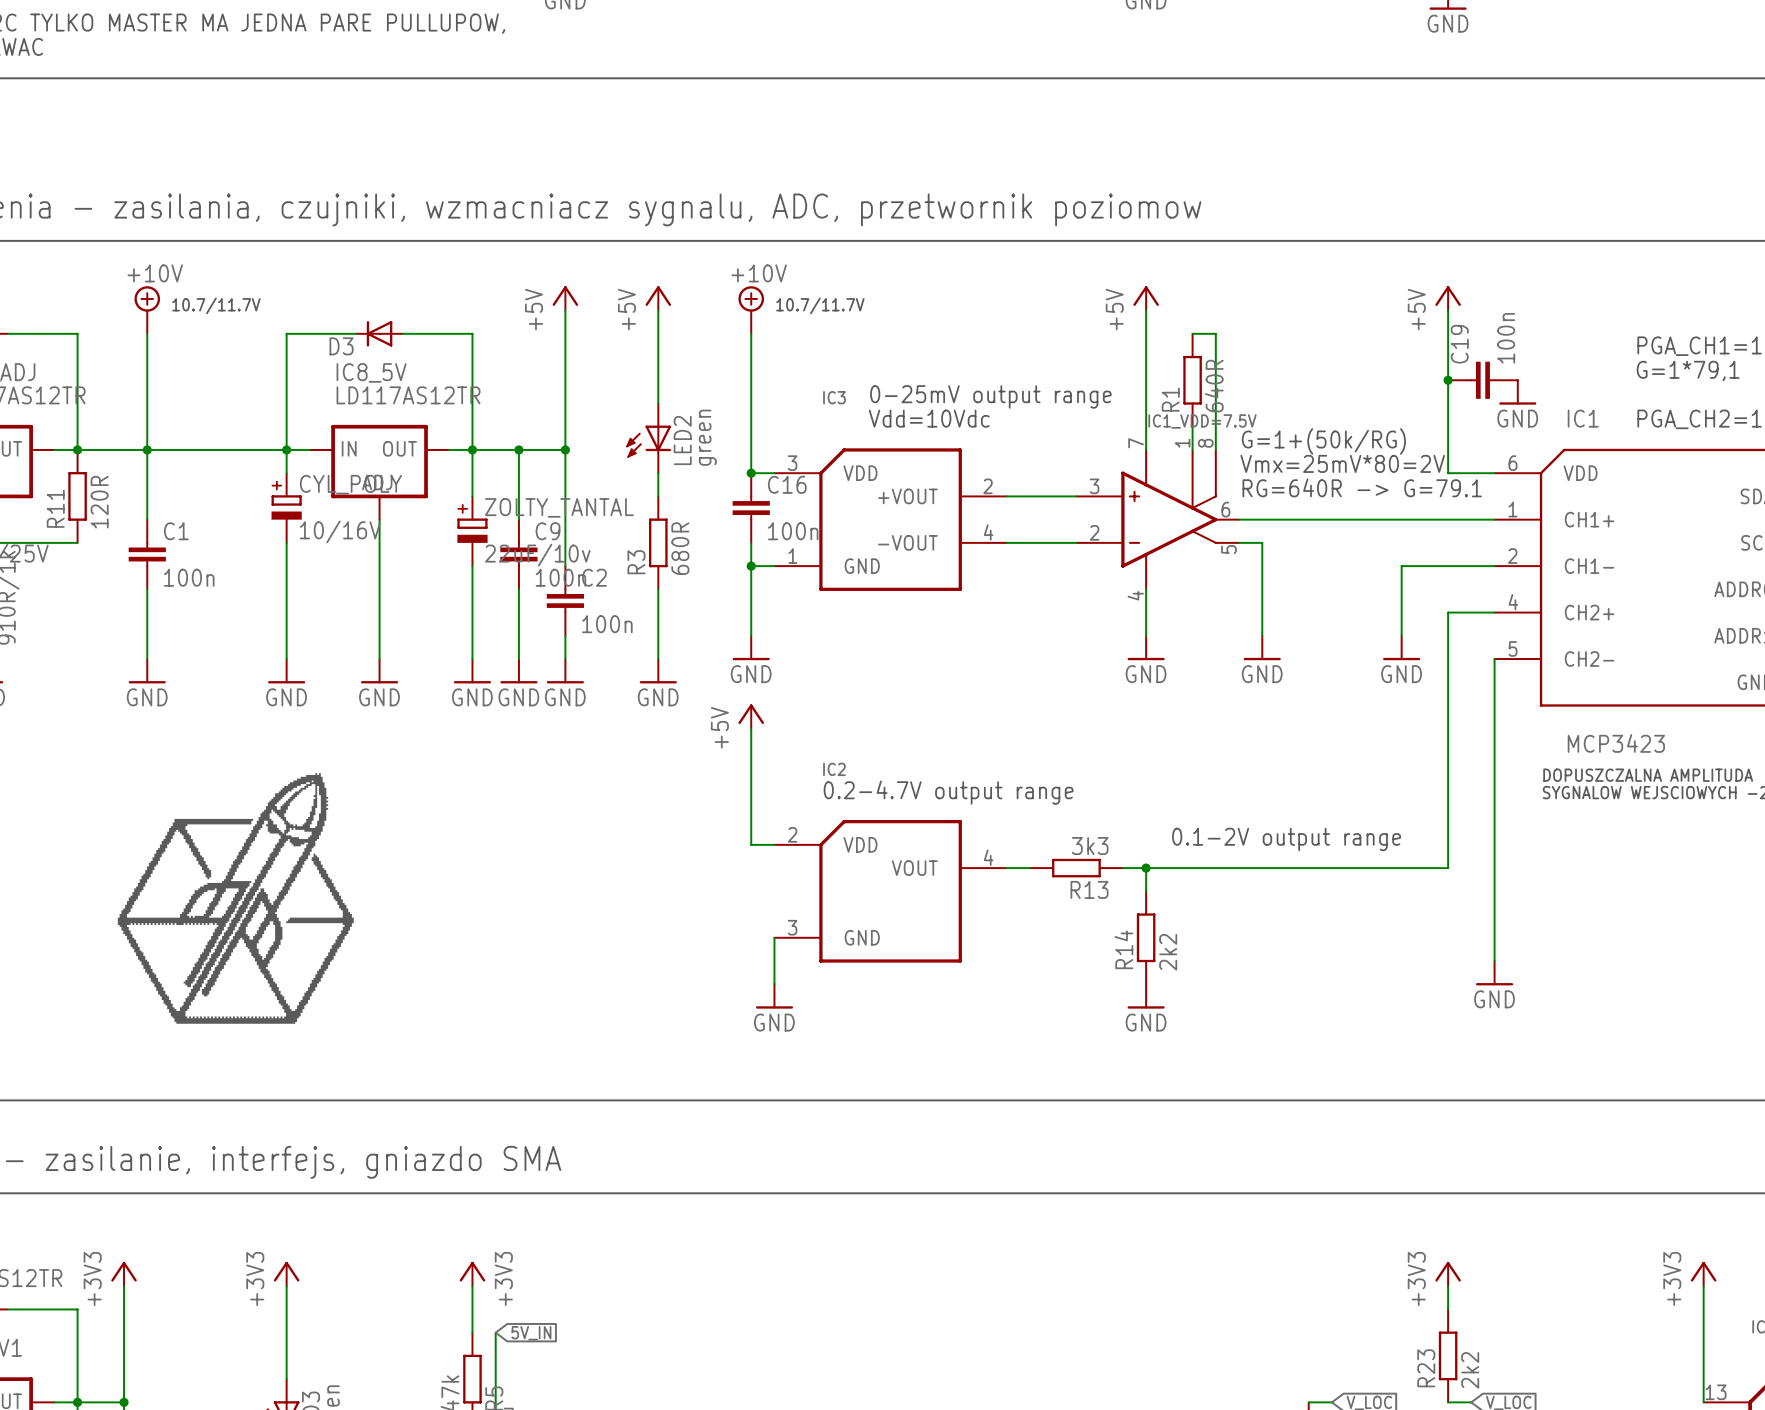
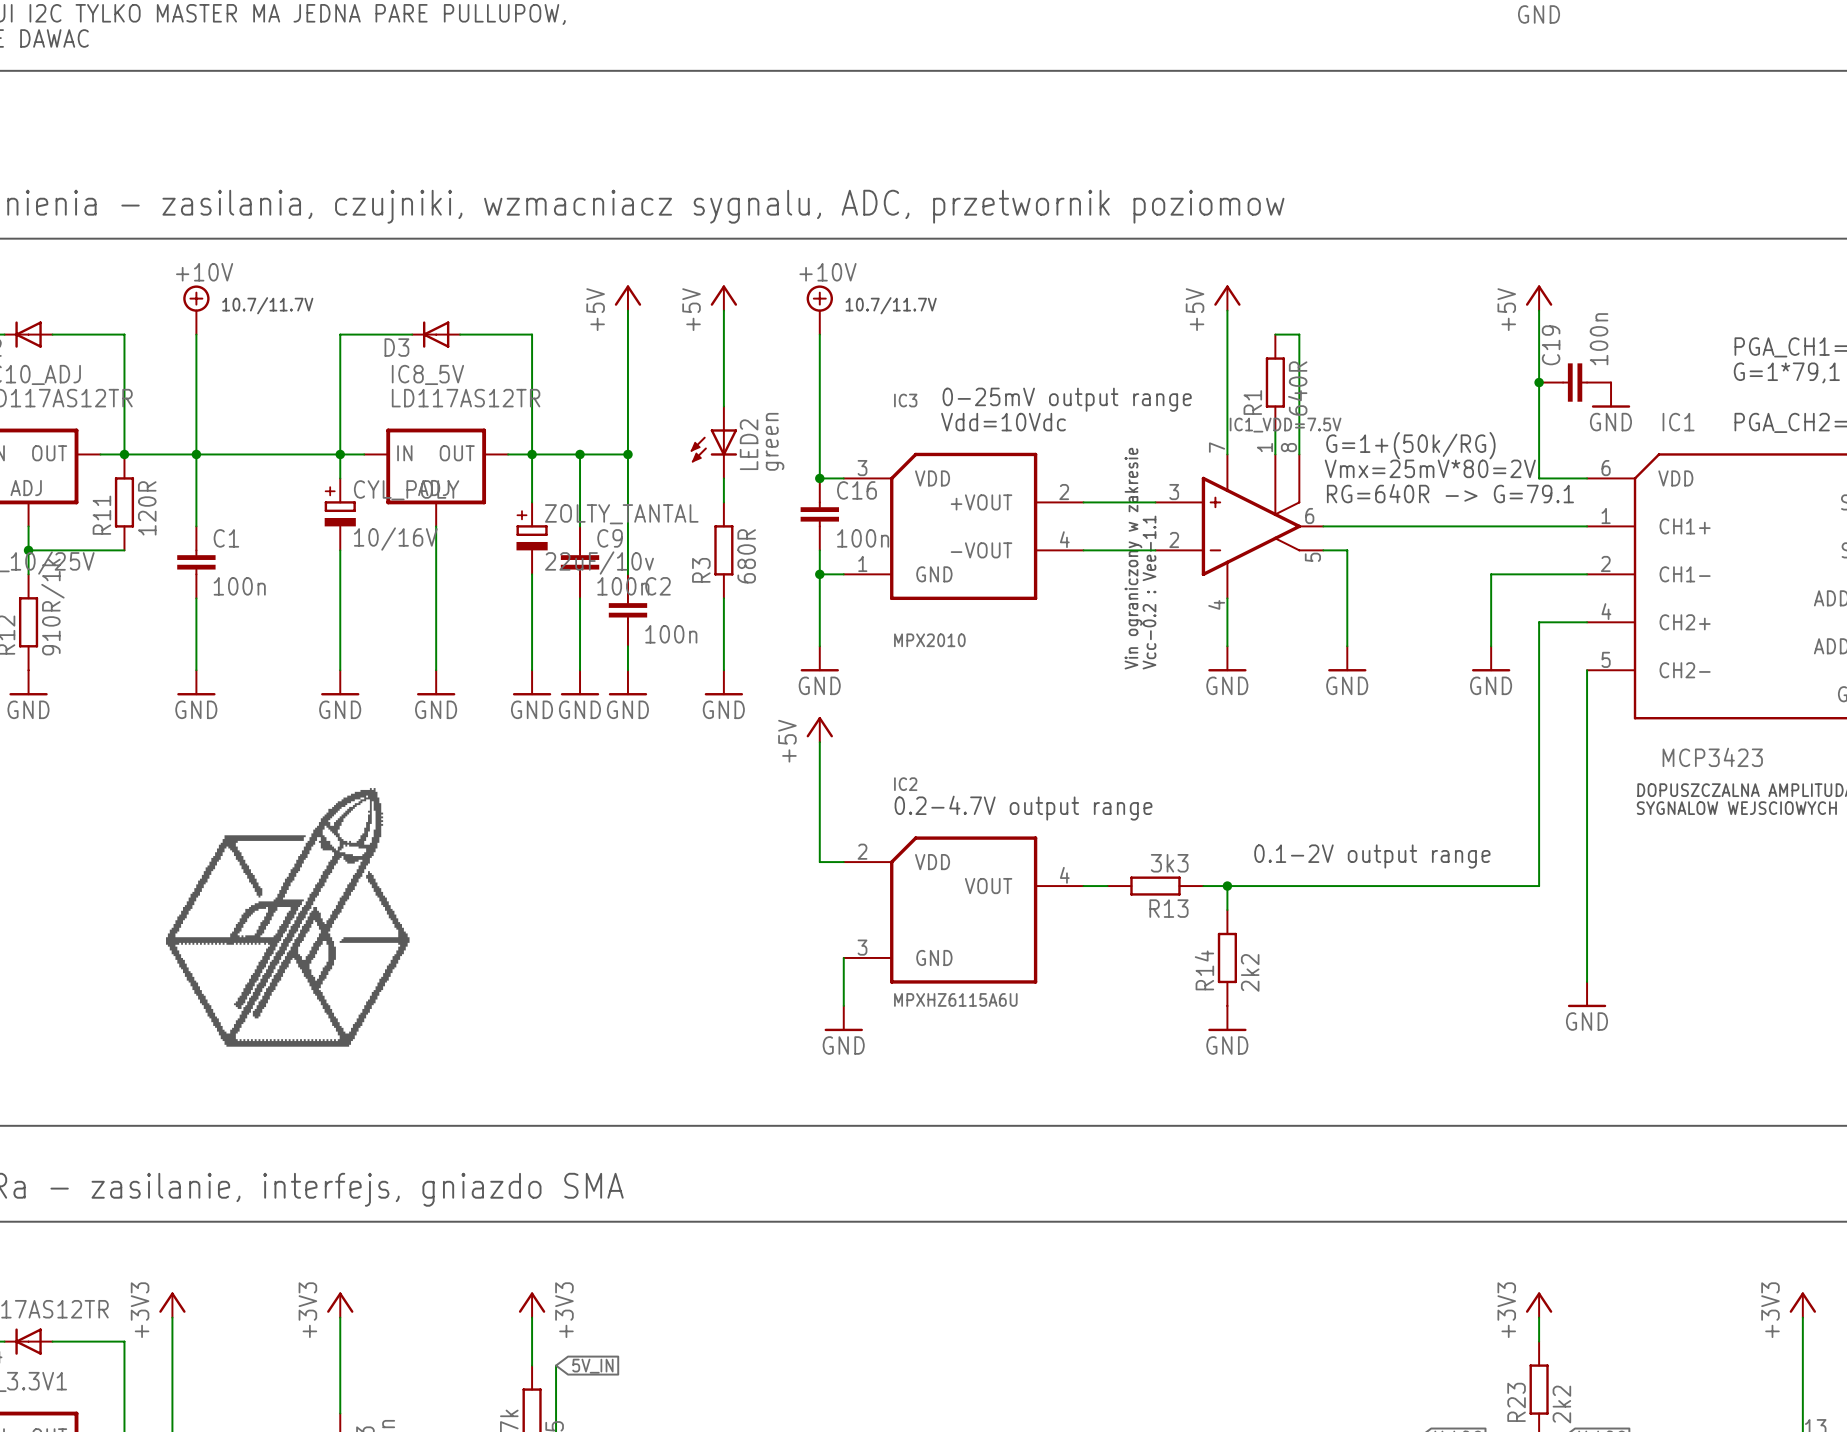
text: none -> Vin ograniczony w zakresie (1133, 558)
text: none -> Vcc-0.2 : Vee-1.1 (1149, 592)
IC3 value: none -> MPX2010 (929, 640)
IC2 value: none -> MPXHZ6115A6U (955, 999)

